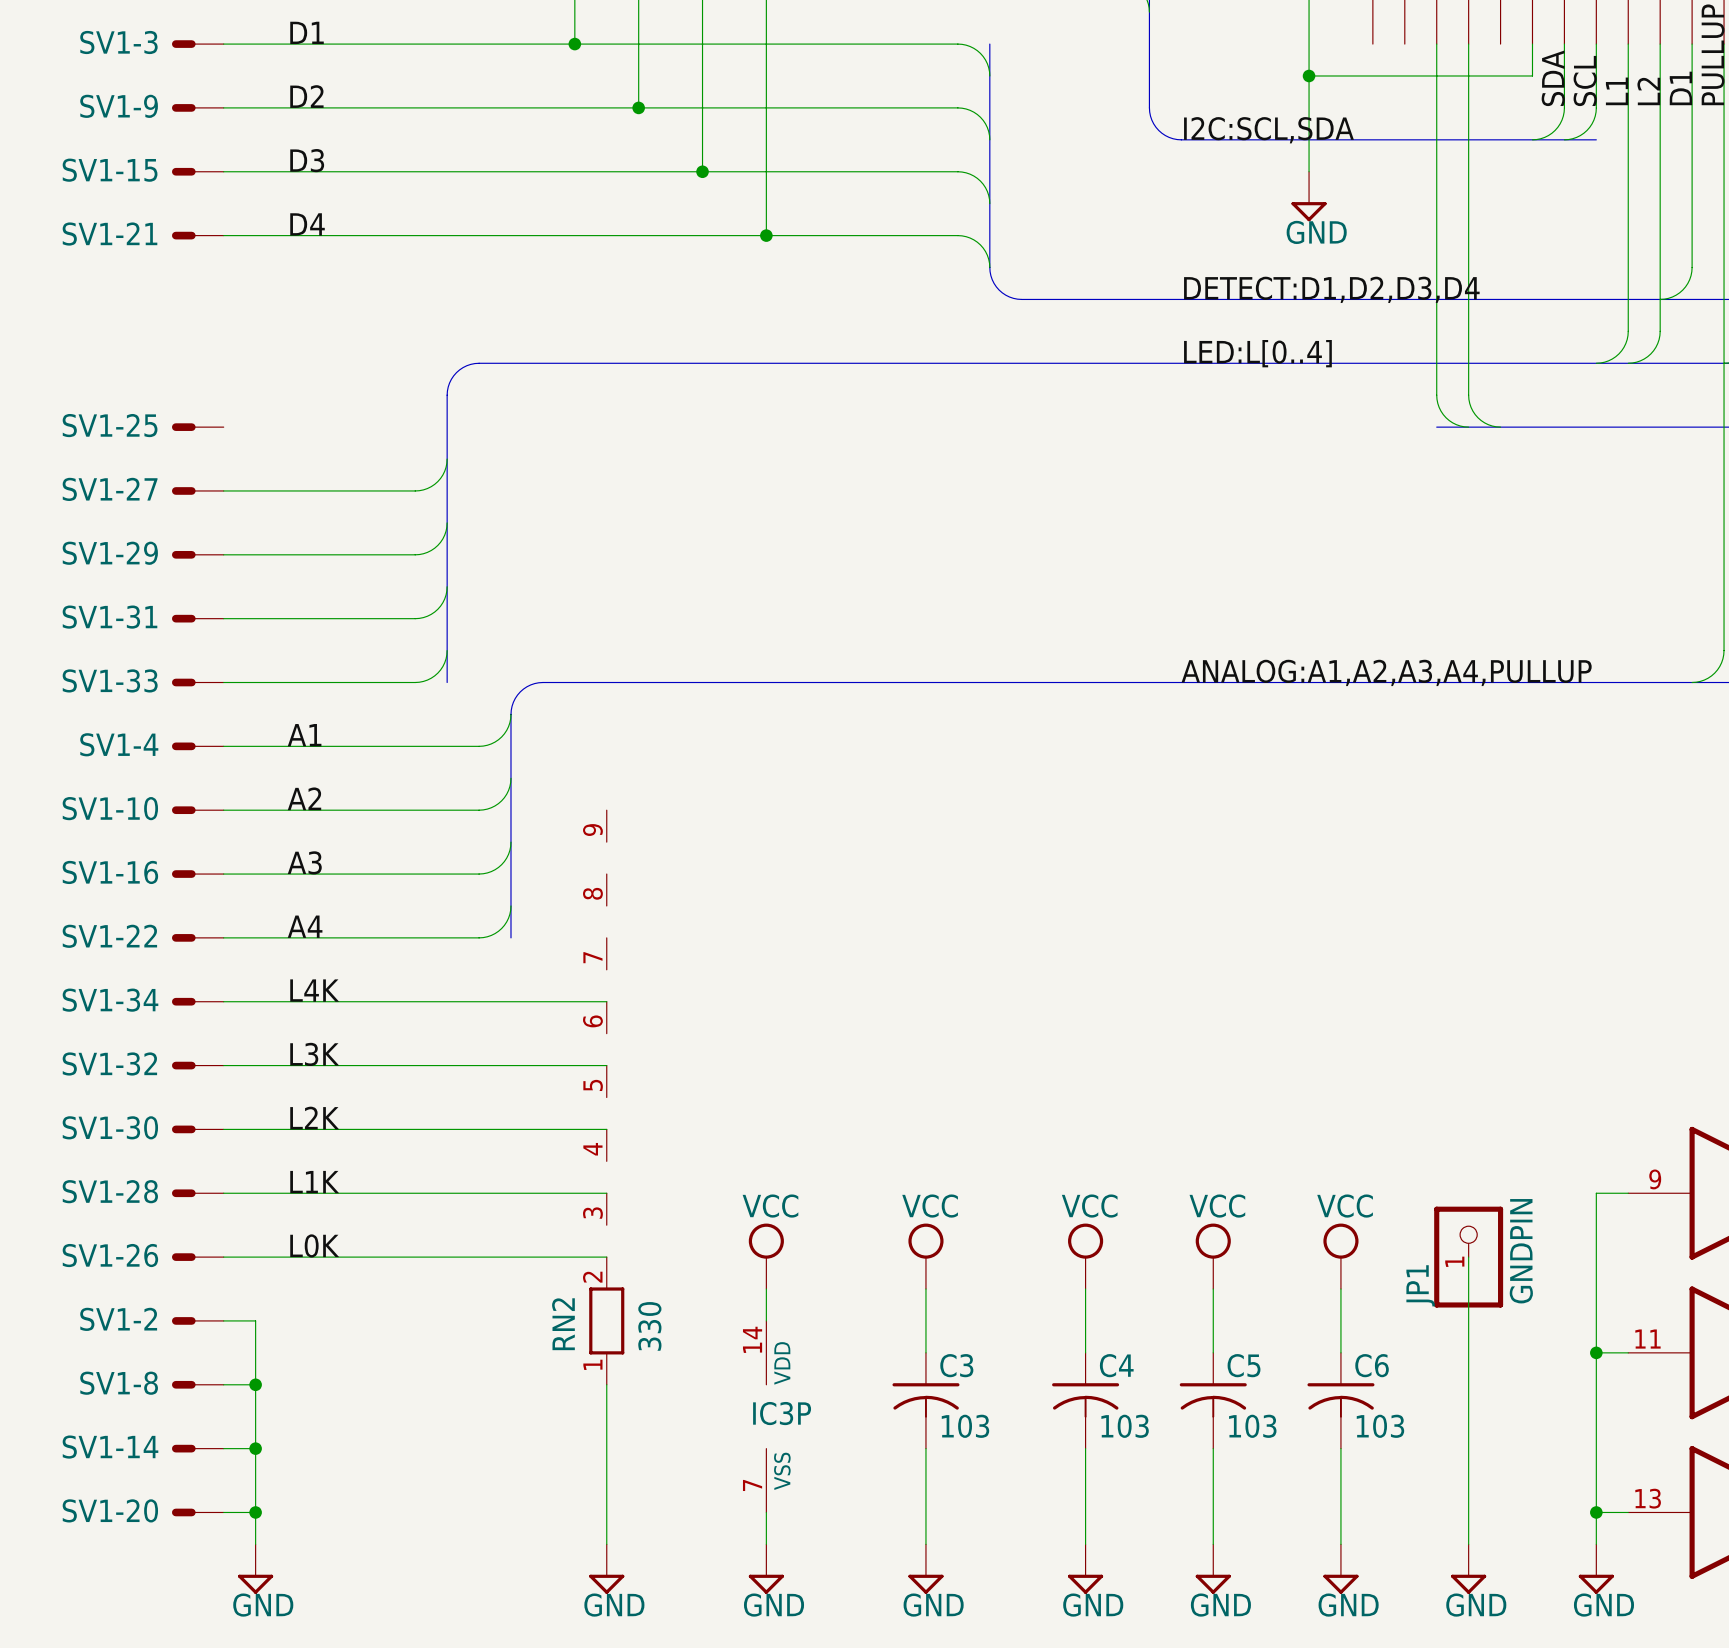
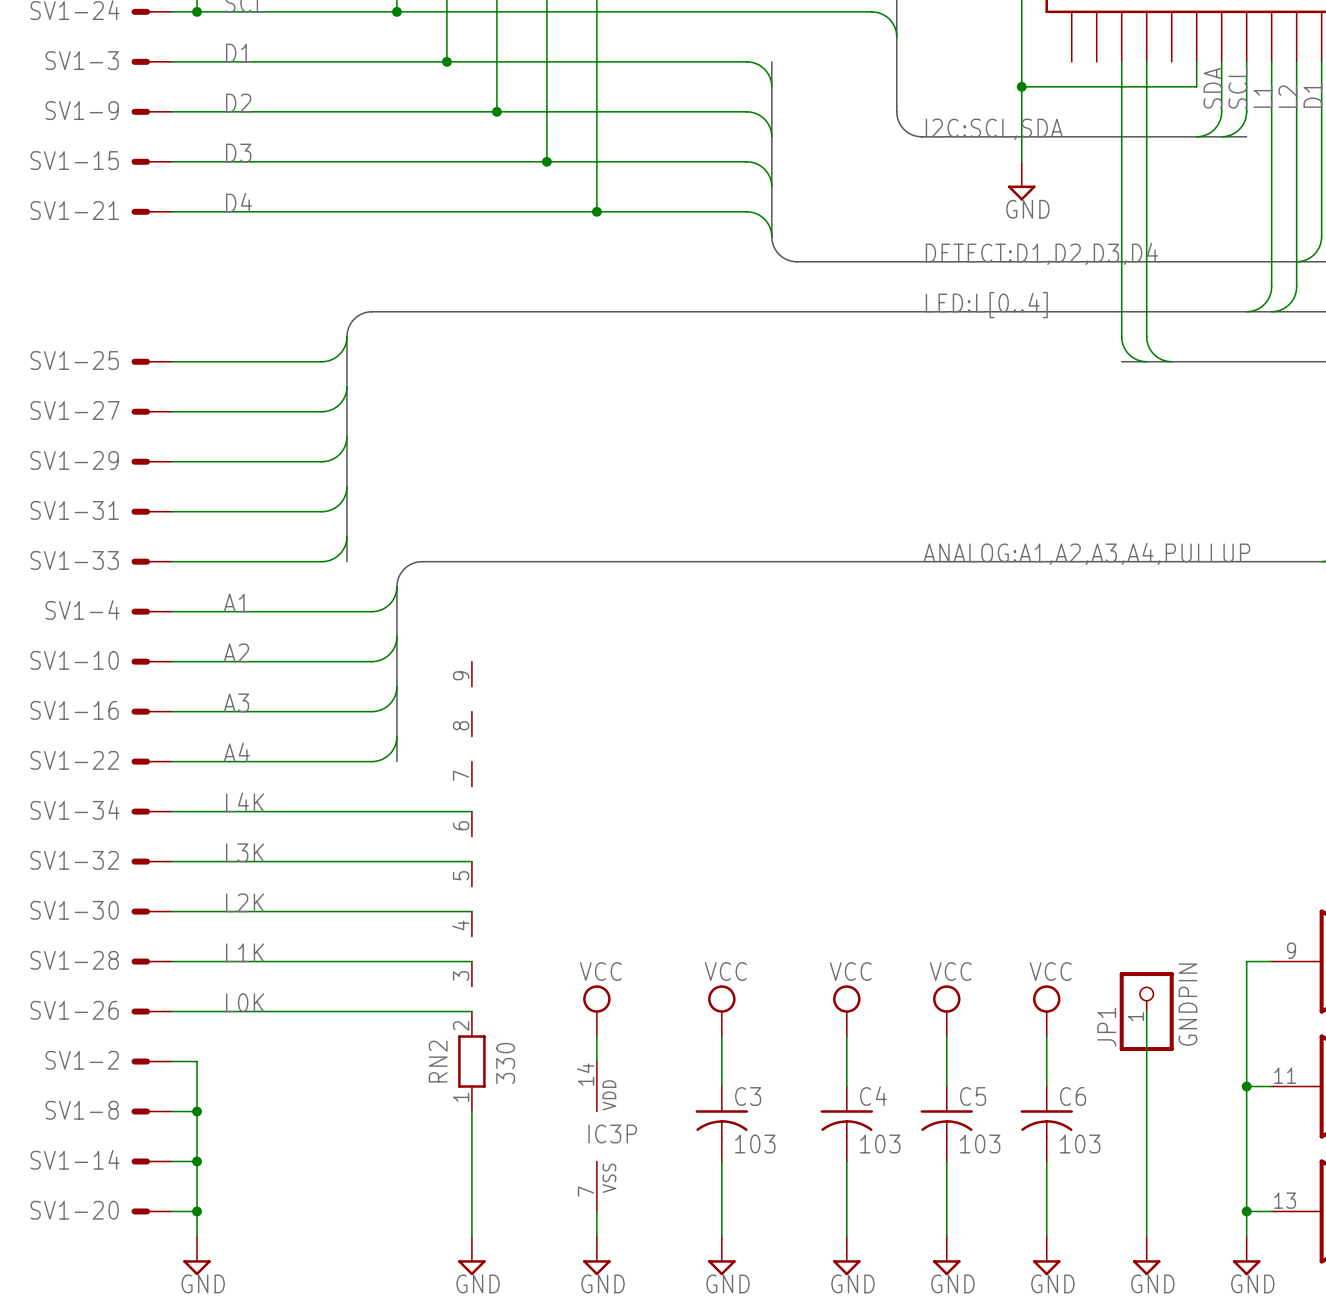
wire: none -> (346, 336) (345, 346) (339, 354) (325, 361) (172, 361)

